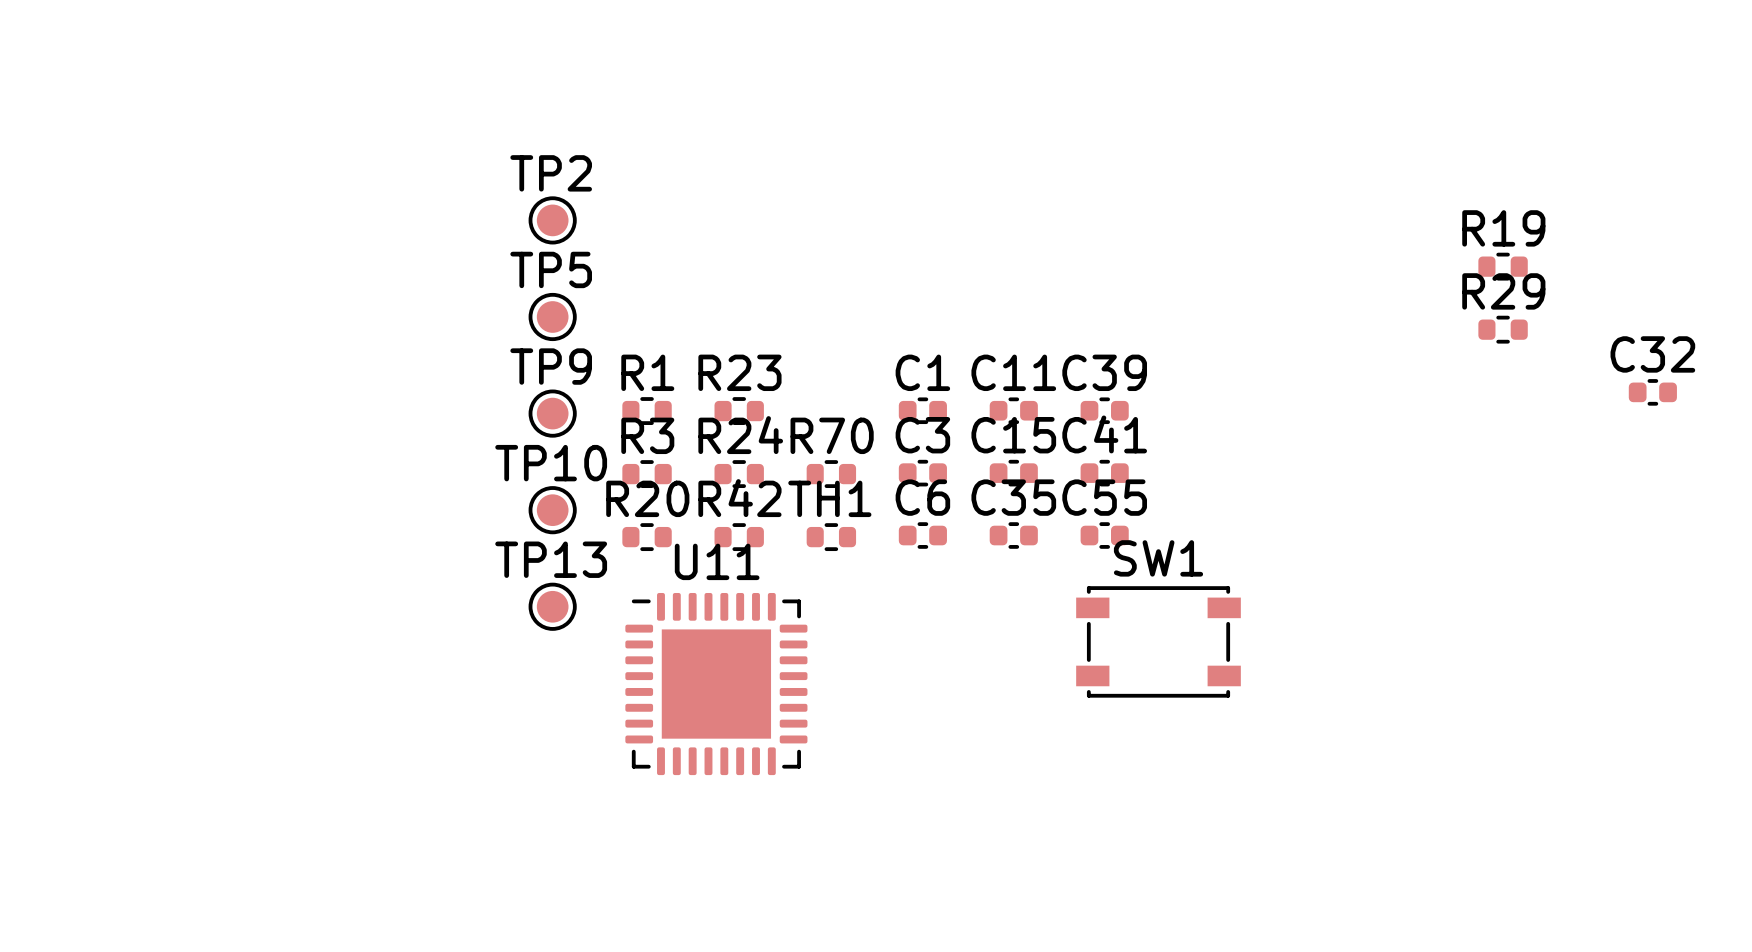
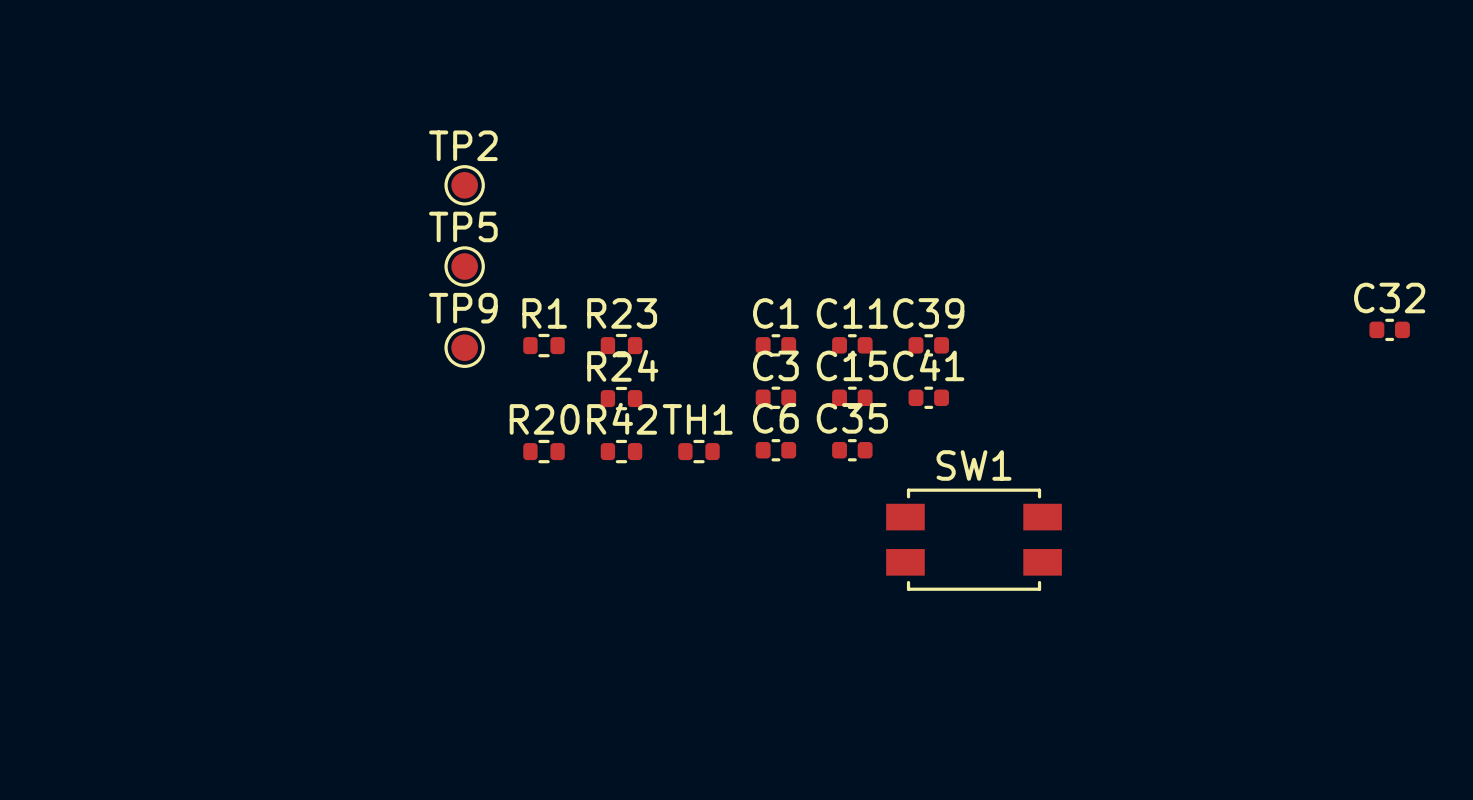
R19: (1503, 266) -> none
R29: (1503, 329) -> none
R3: (647, 474) -> none
R70: (831, 474) -> none
TP10: (552, 510) -> none
C55: (1104, 535) -> none
SW1 footprint: [1076, 586, 1241, 698] -> [886, 488, 1062, 591]
TP13: (552, 606) -> none
U11: (716, 684) -> none

